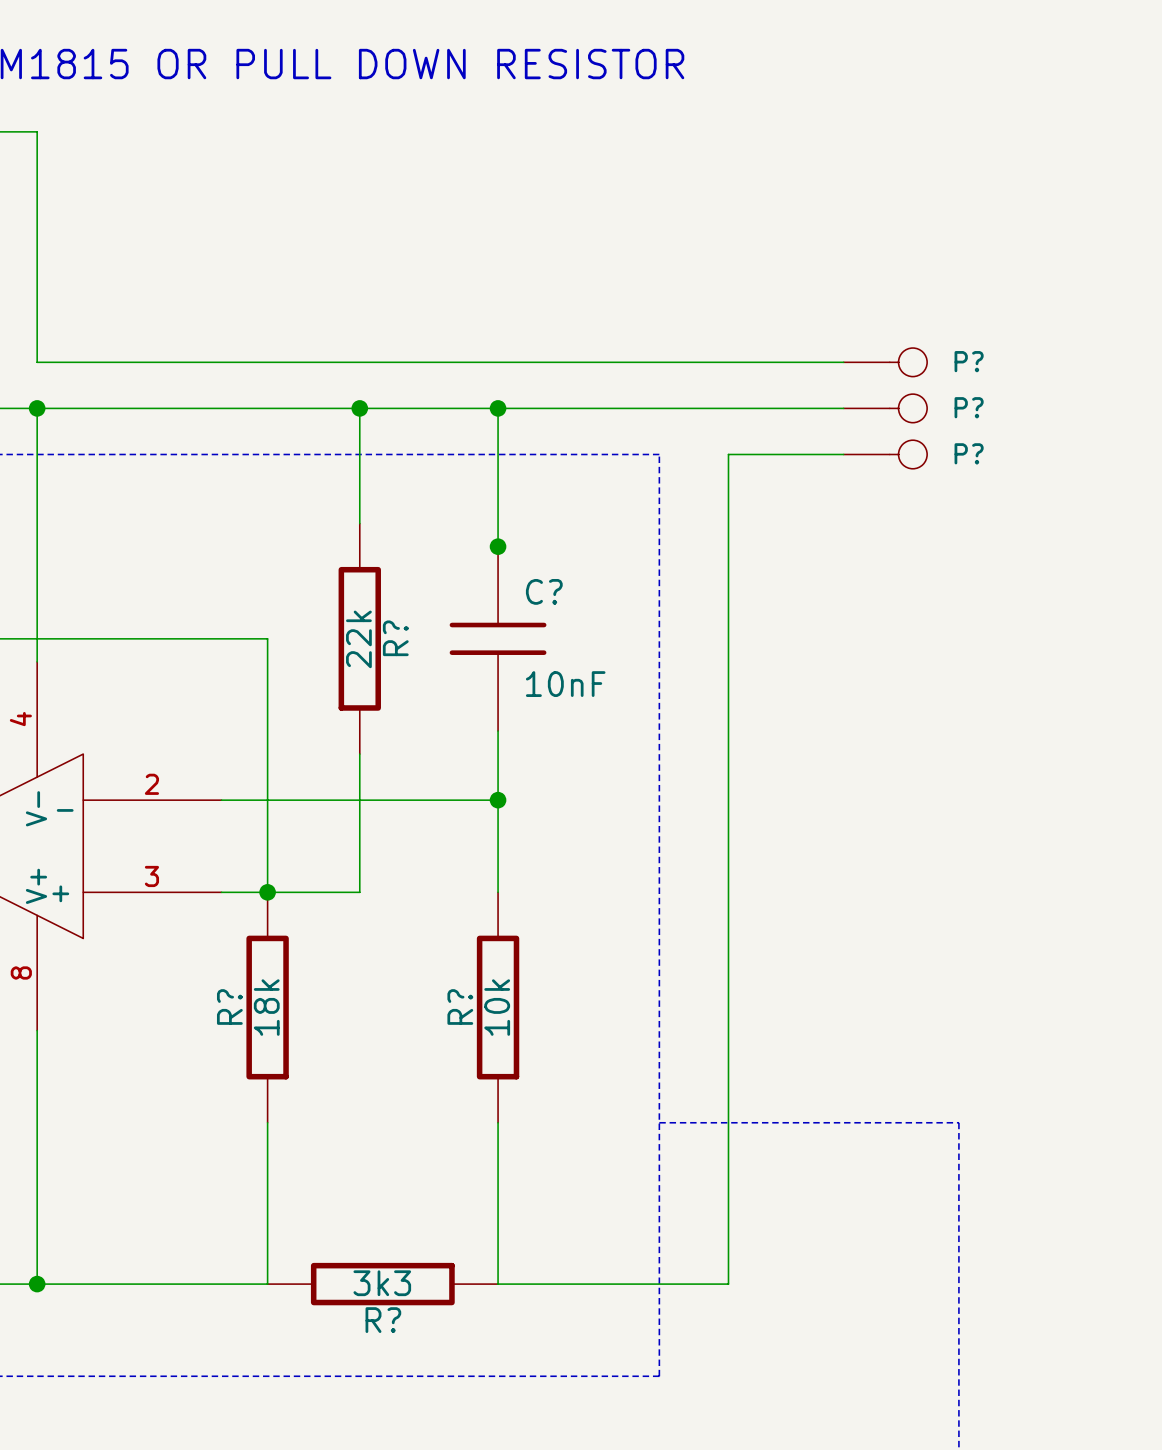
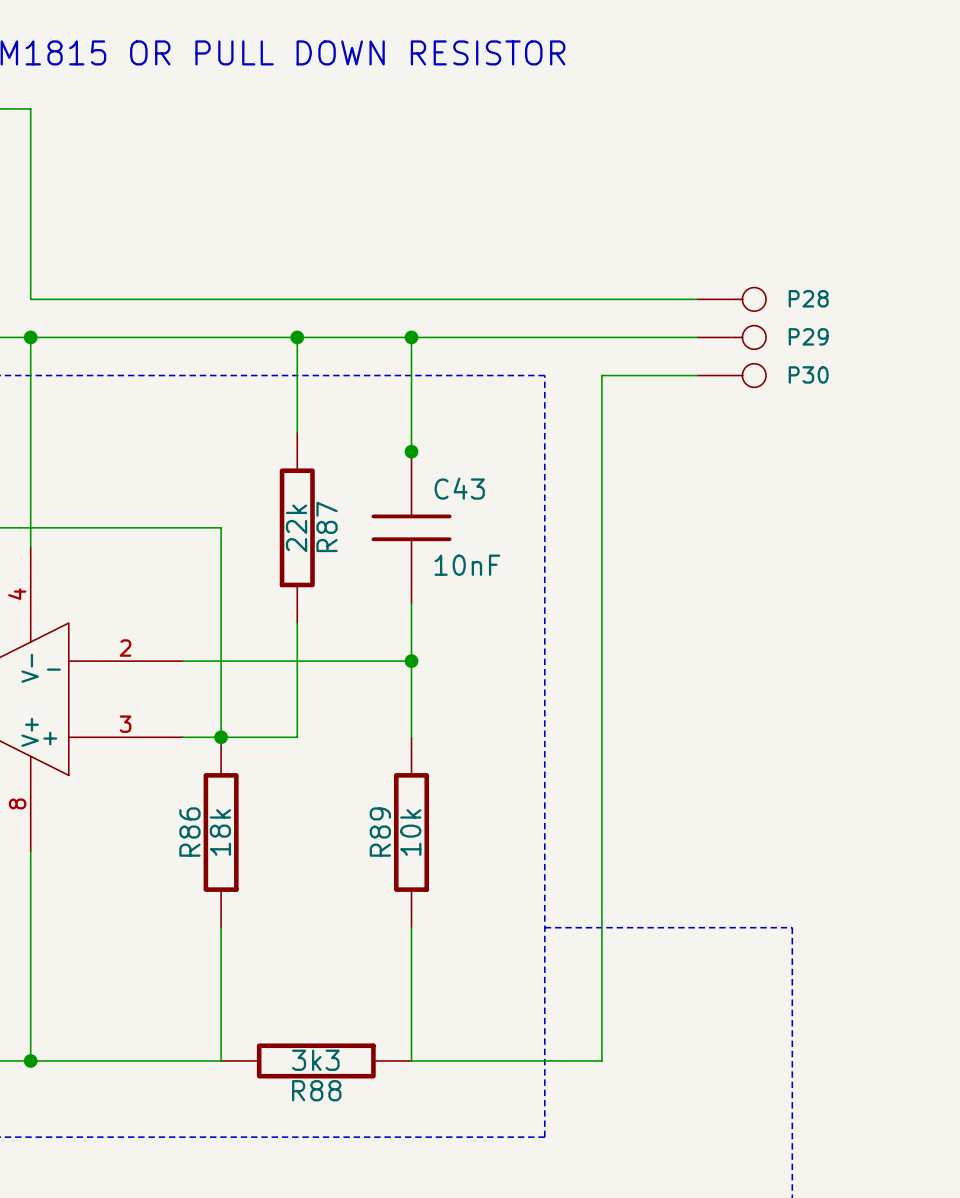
P? name: P? (969, 361) -> P28 (808, 298)
P? name: P? (969, 407) -> P29 (808, 336)
P? name: P? (969, 453) -> P30 (808, 374)
C? name: C? (544, 591) -> C43 (459, 488)
R? name: R? (395, 638) -> R87 (327, 526)
R? name: R? (229, 1007) -> R86 (189, 832)
R? name: R? (460, 1007) -> R89 (380, 832)
R? name: R? (383, 1320) -> R88 (316, 1090)

